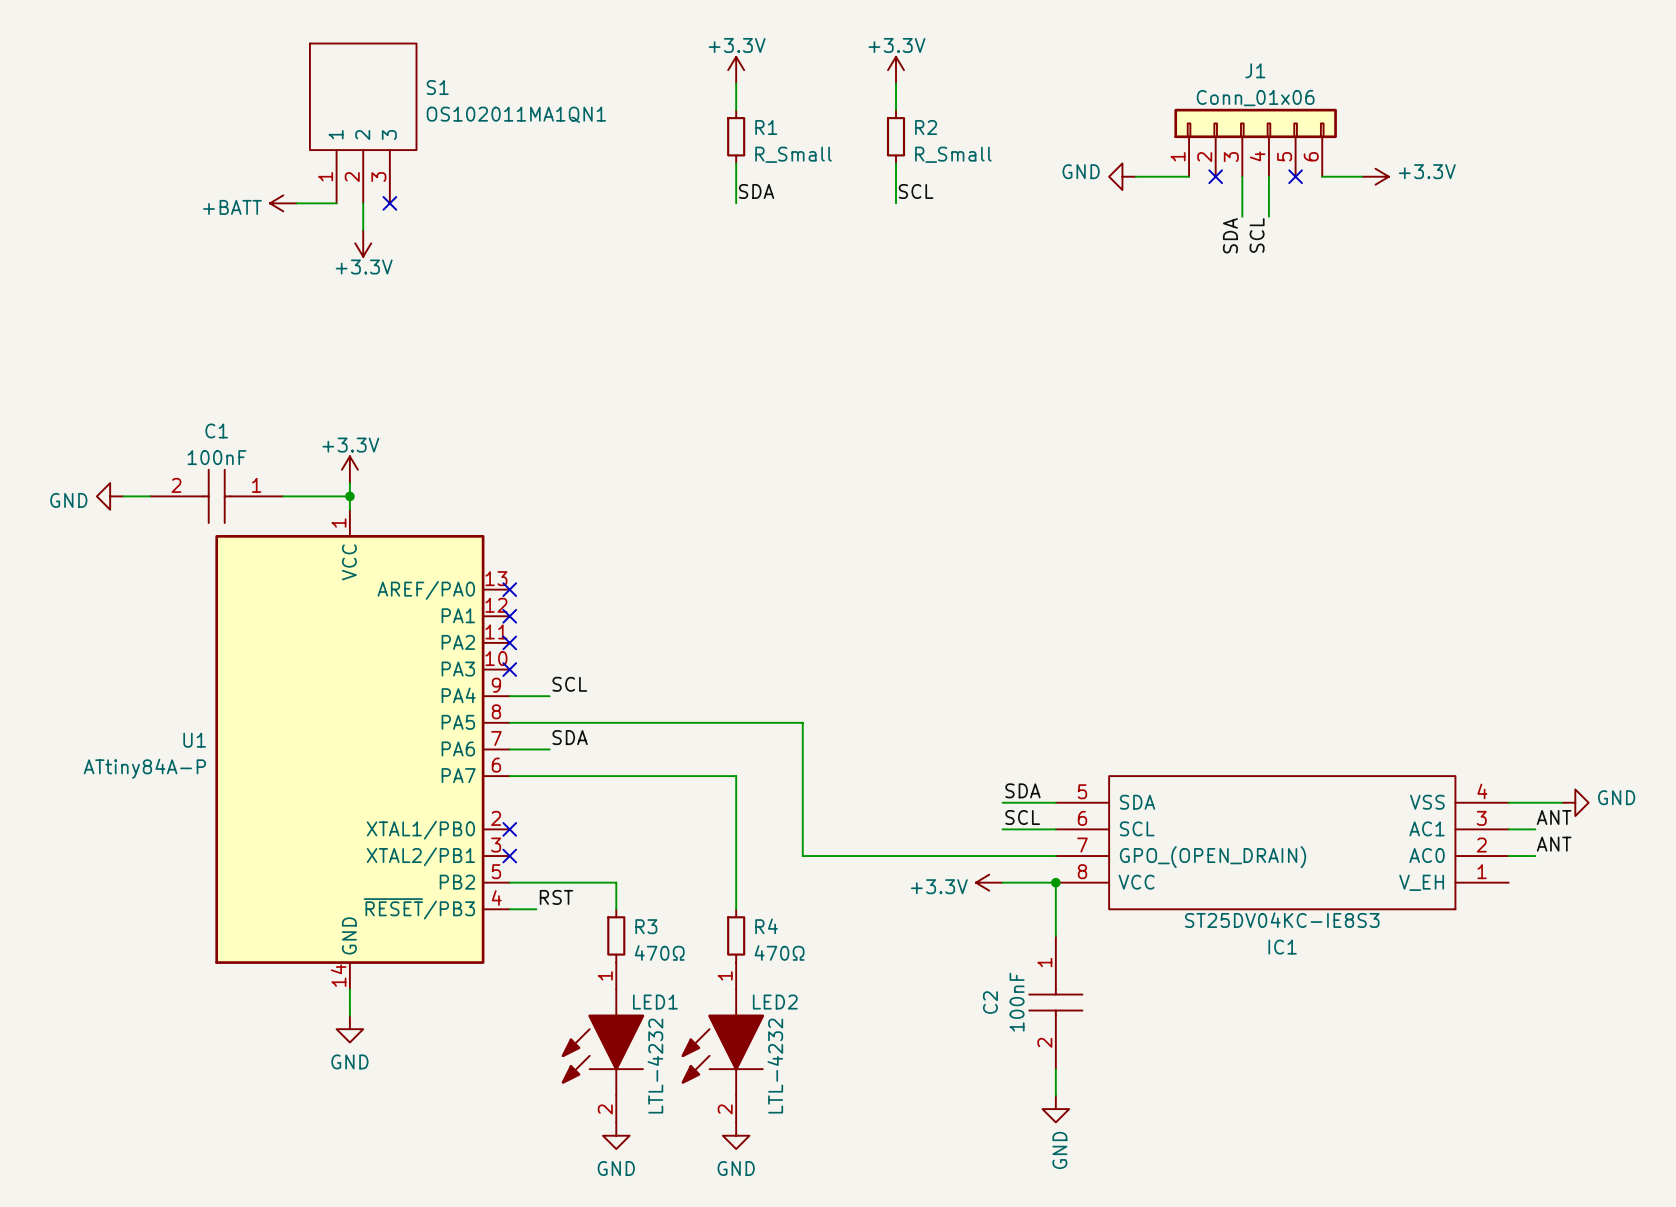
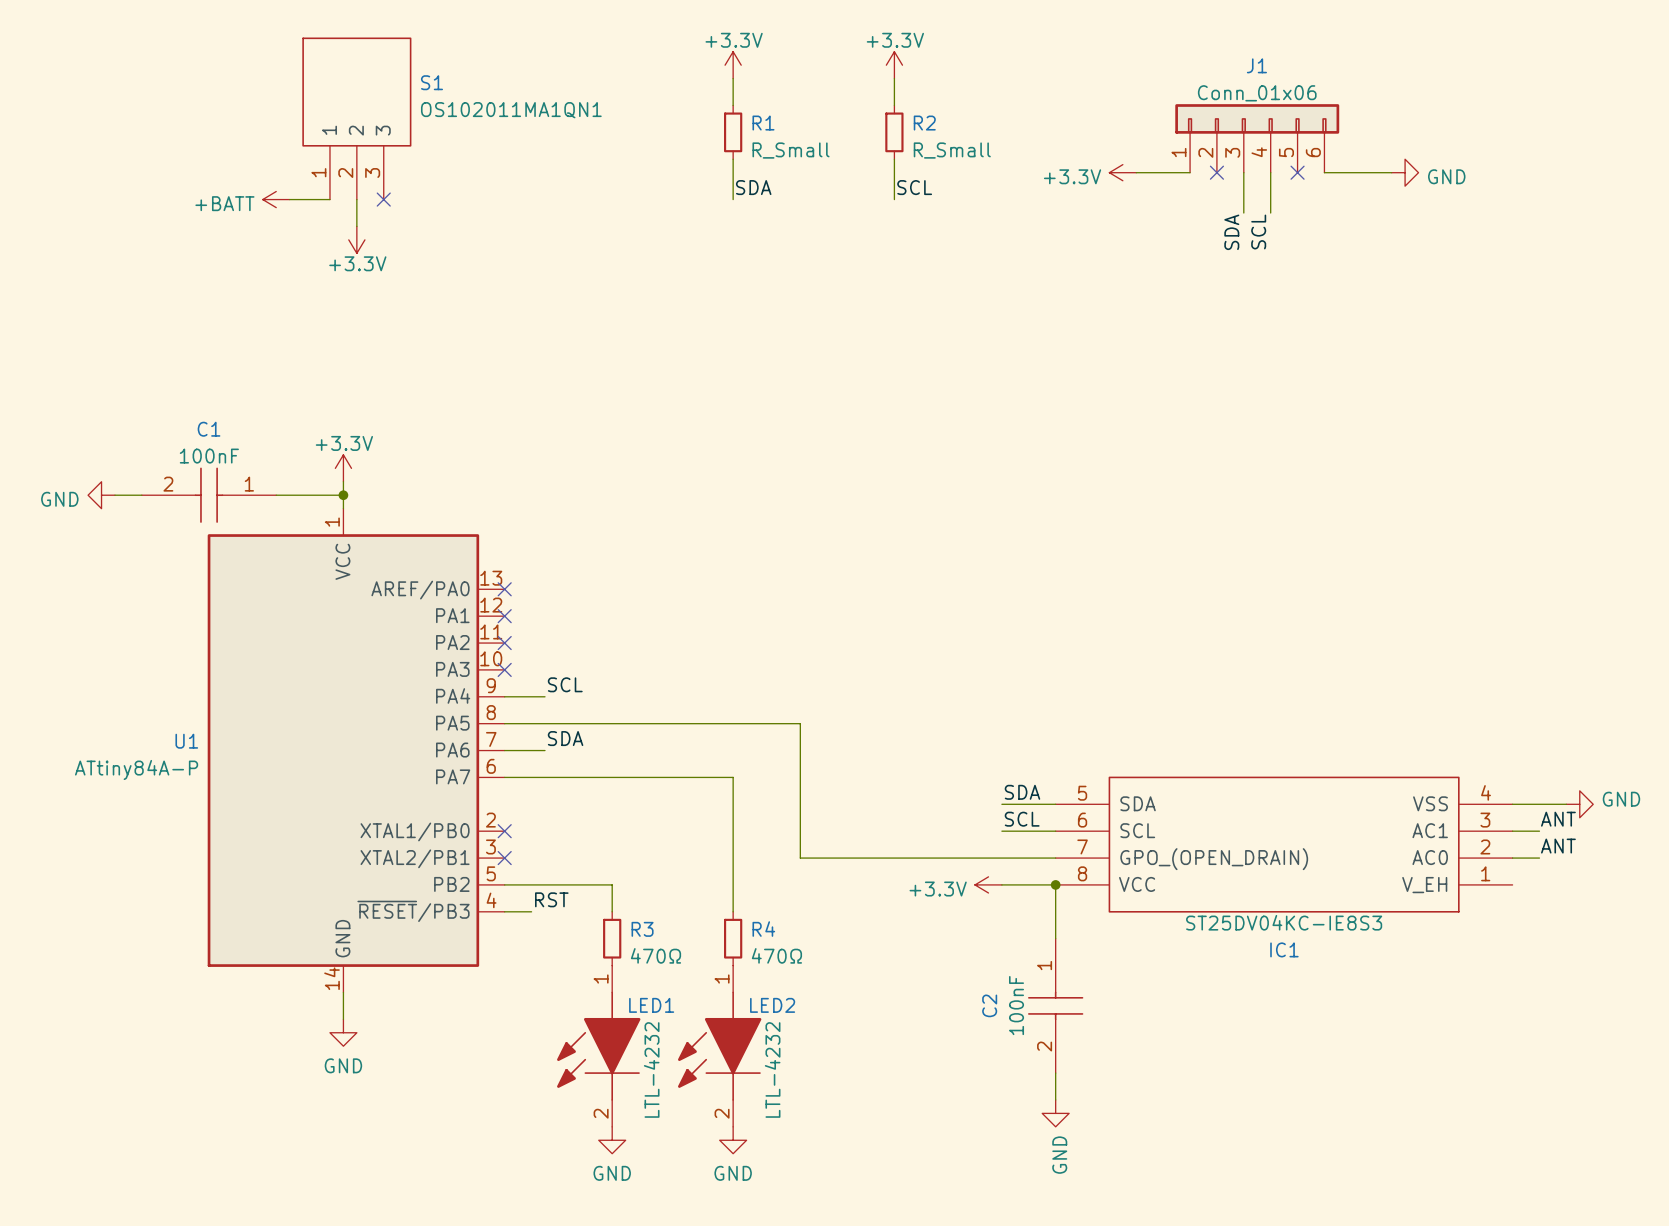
power symbol: GND (1122, 176) -> +3.3V (1122, 172)
power symbol: +3.3V (1375, 176) -> none
power symbol: none -> GND (1405, 172)

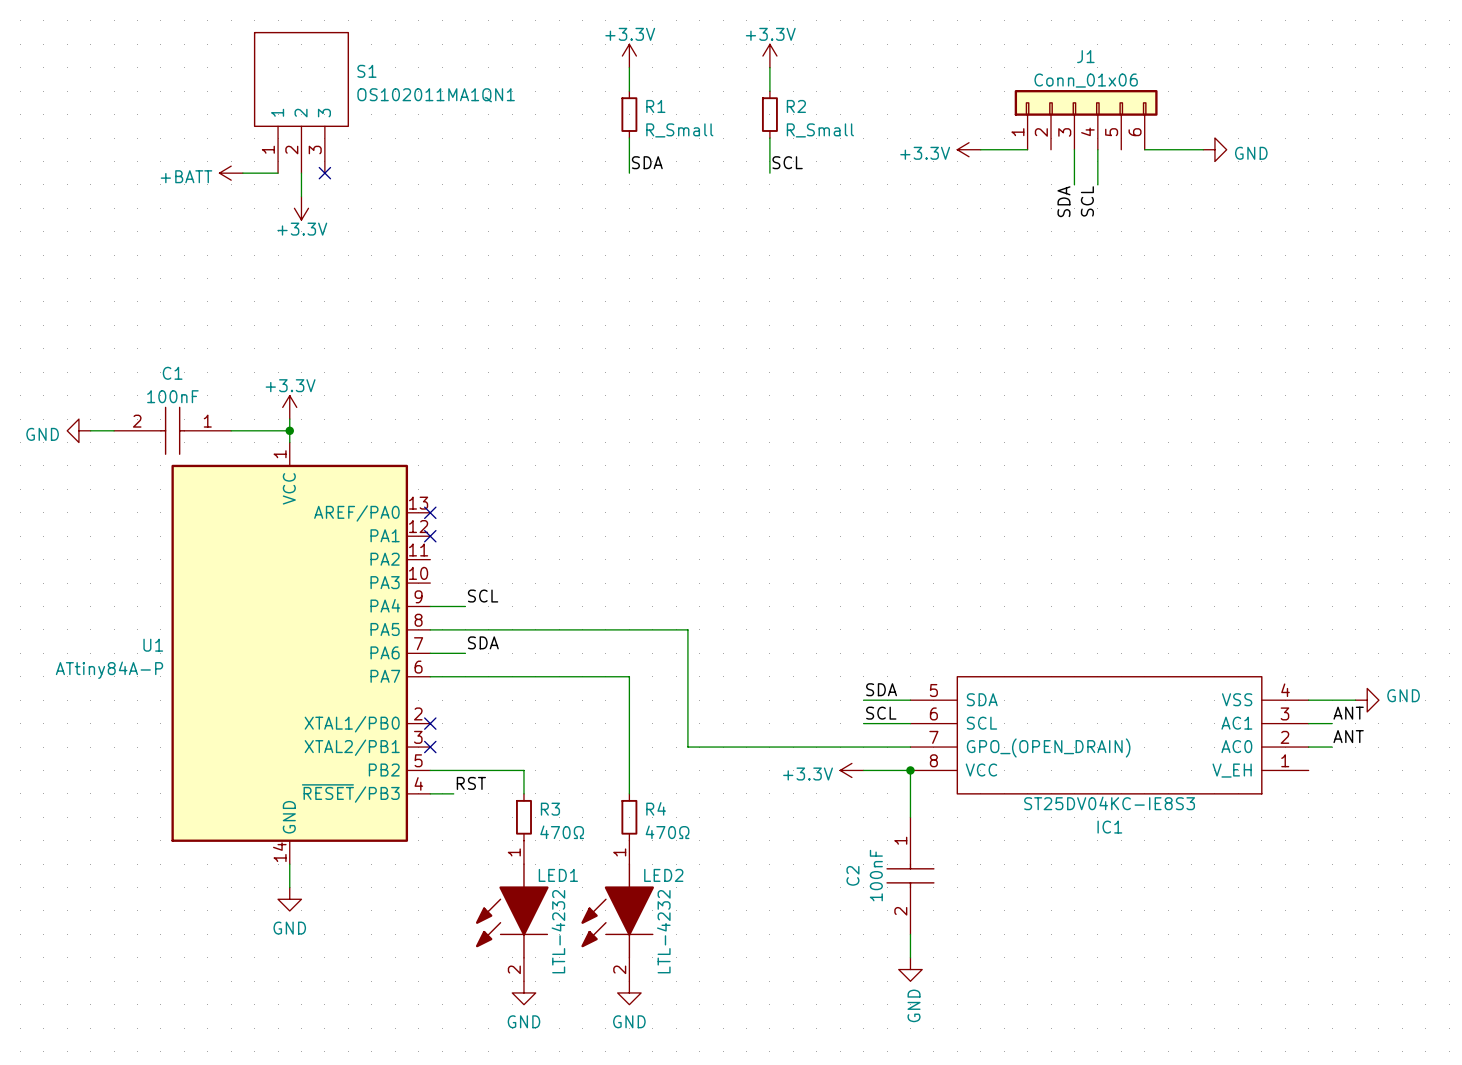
no-connect mark: (1216, 172) -> none
no-connect mark: (1297, 172) -> none
no-connect mark: (504, 643) -> none
no-connect mark: (504, 669) -> none

